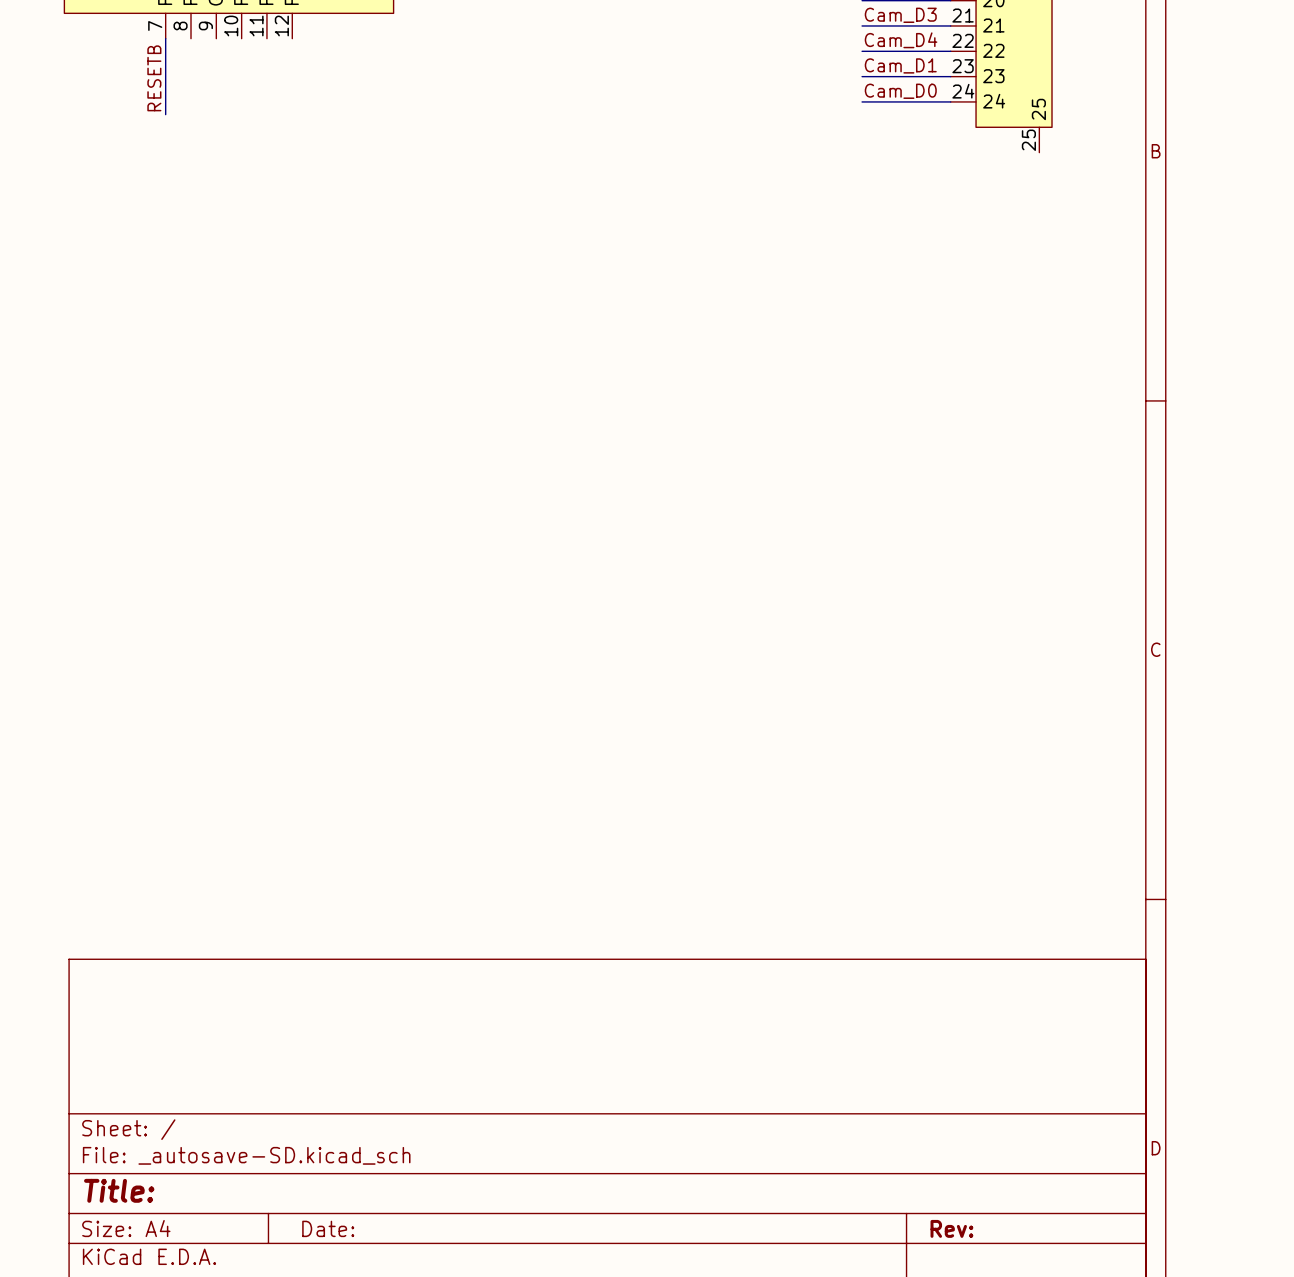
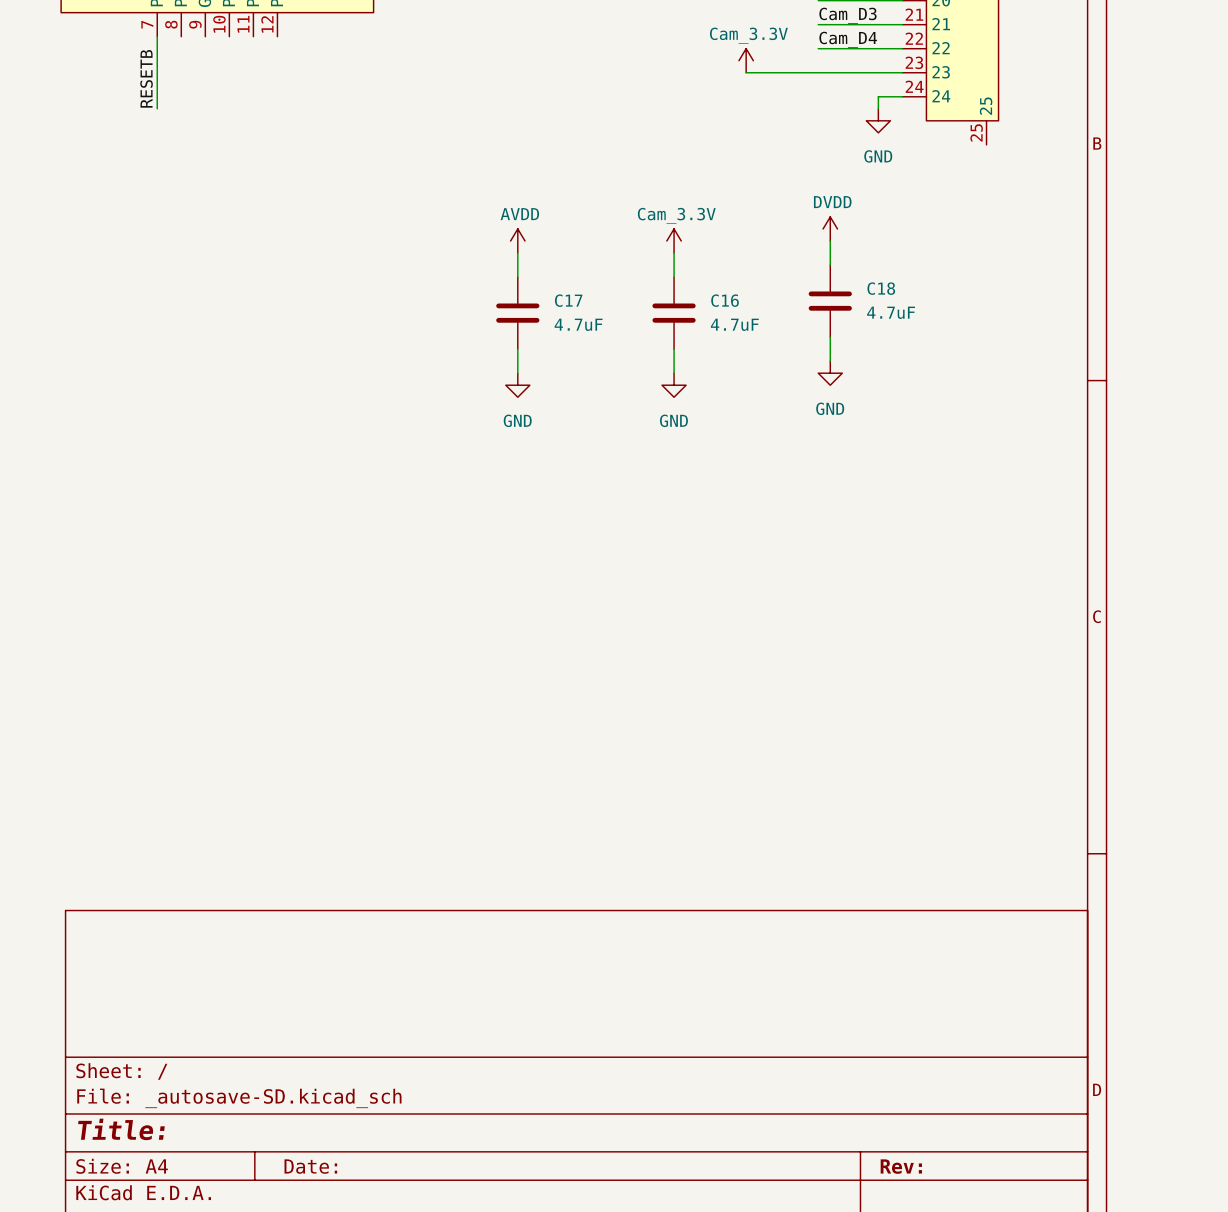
power symbol: none -> Cam_3.3V (746, 60)
label: Cam_D1 (900, 65) -> none
wire: none -> (746, 72) (818, 72)
label: Cam_D0 (900, 91) -> none
wire: (862, 101) (925, 101) -> (878, 108) (878, 96)
power symbol: none -> GND (878, 120)
power symbol: none -> DVDD (830, 228)
power symbol: none -> AVDD (517, 241)
power symbol: none -> Cam_3.3V (674, 241)
wire: none -> (830, 241) (830, 265)
wire: none -> (517, 253) (517, 277)
wire: none -> (674, 253) (674, 277)
C18: none -> 4.7uF (830, 301)
C17: none -> 4.7uF (517, 313)
C16: none -> 4.7uF (674, 313)
wire: none -> (830, 337) (830, 361)
wire: none -> (517, 349) (517, 373)
wire: none -> (674, 349) (674, 373)
power symbol: none -> GND (830, 373)
power symbol: none -> GND (517, 385)
power symbol: none -> GND (674, 385)

